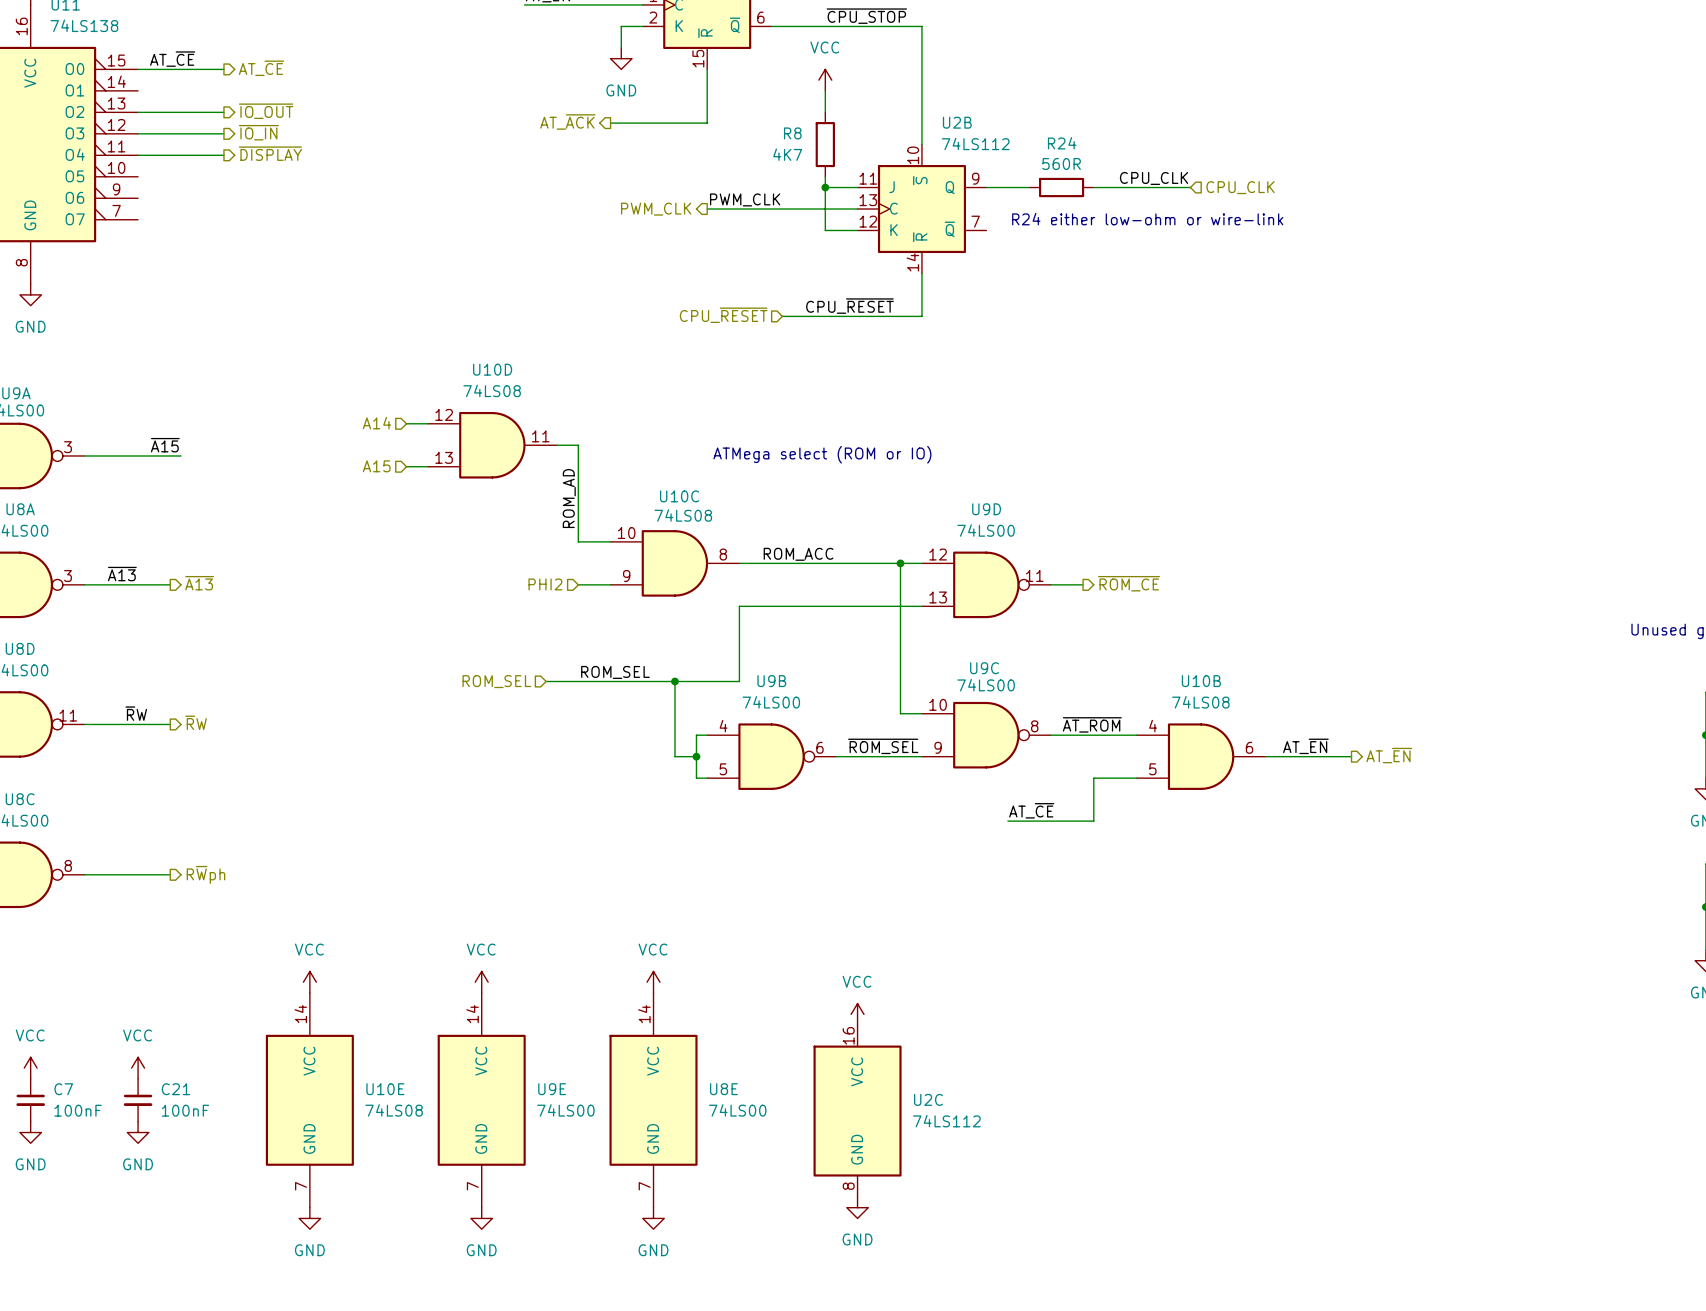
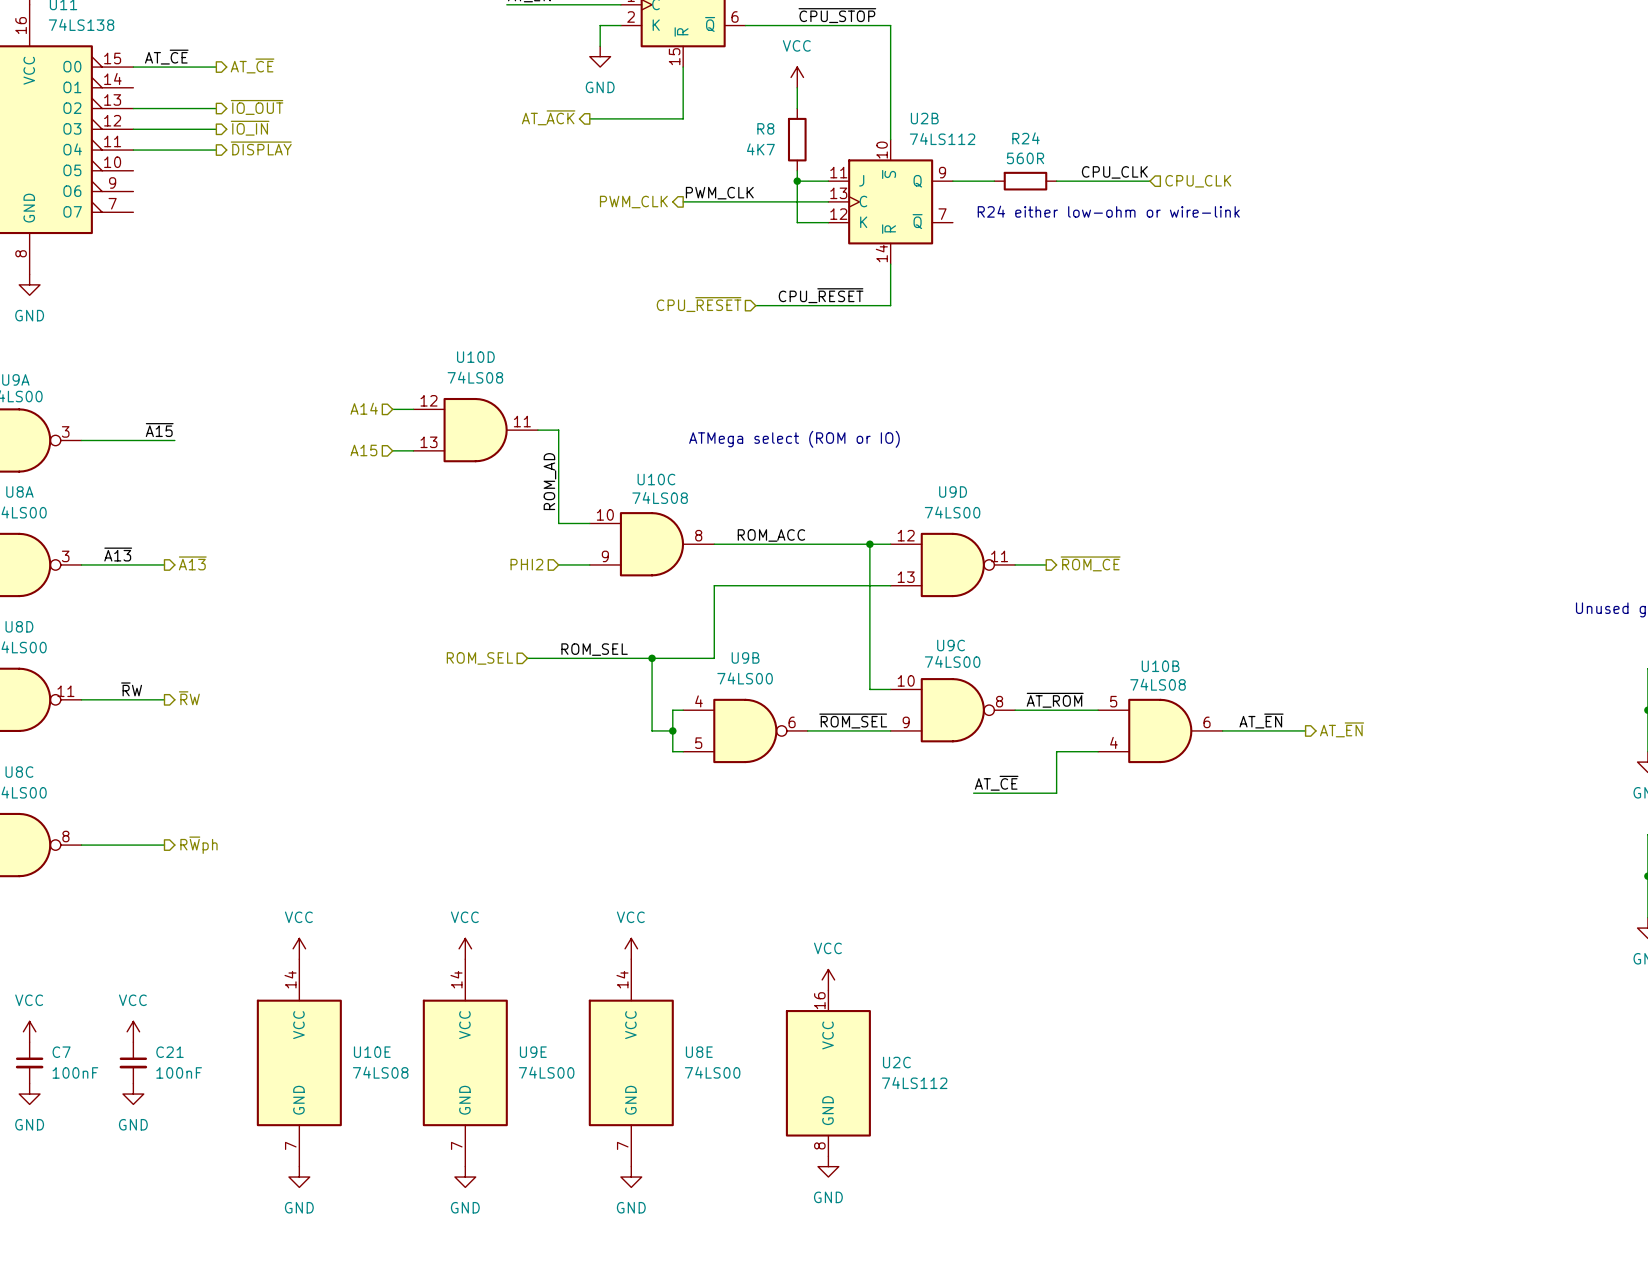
U10B flip: as is (1201, 756) -> up-down (1160, 730)

